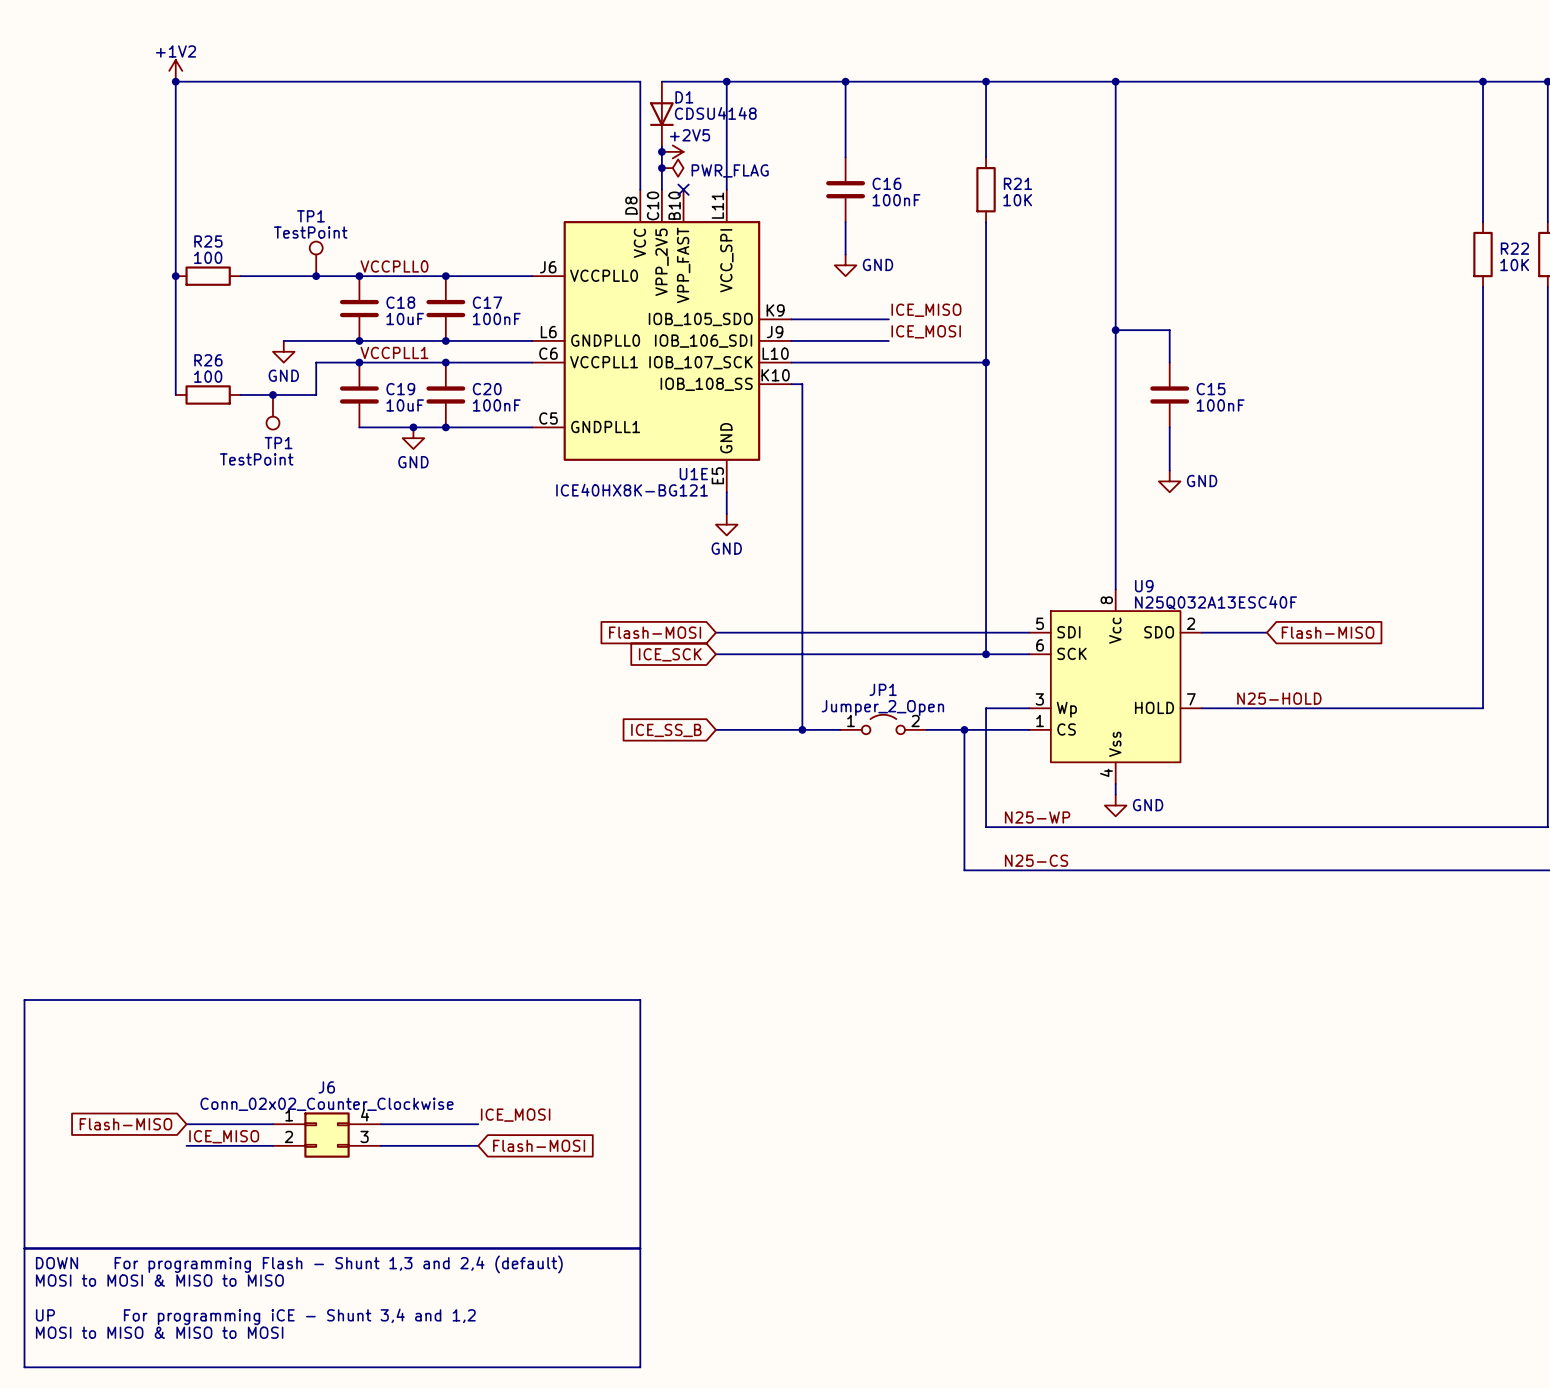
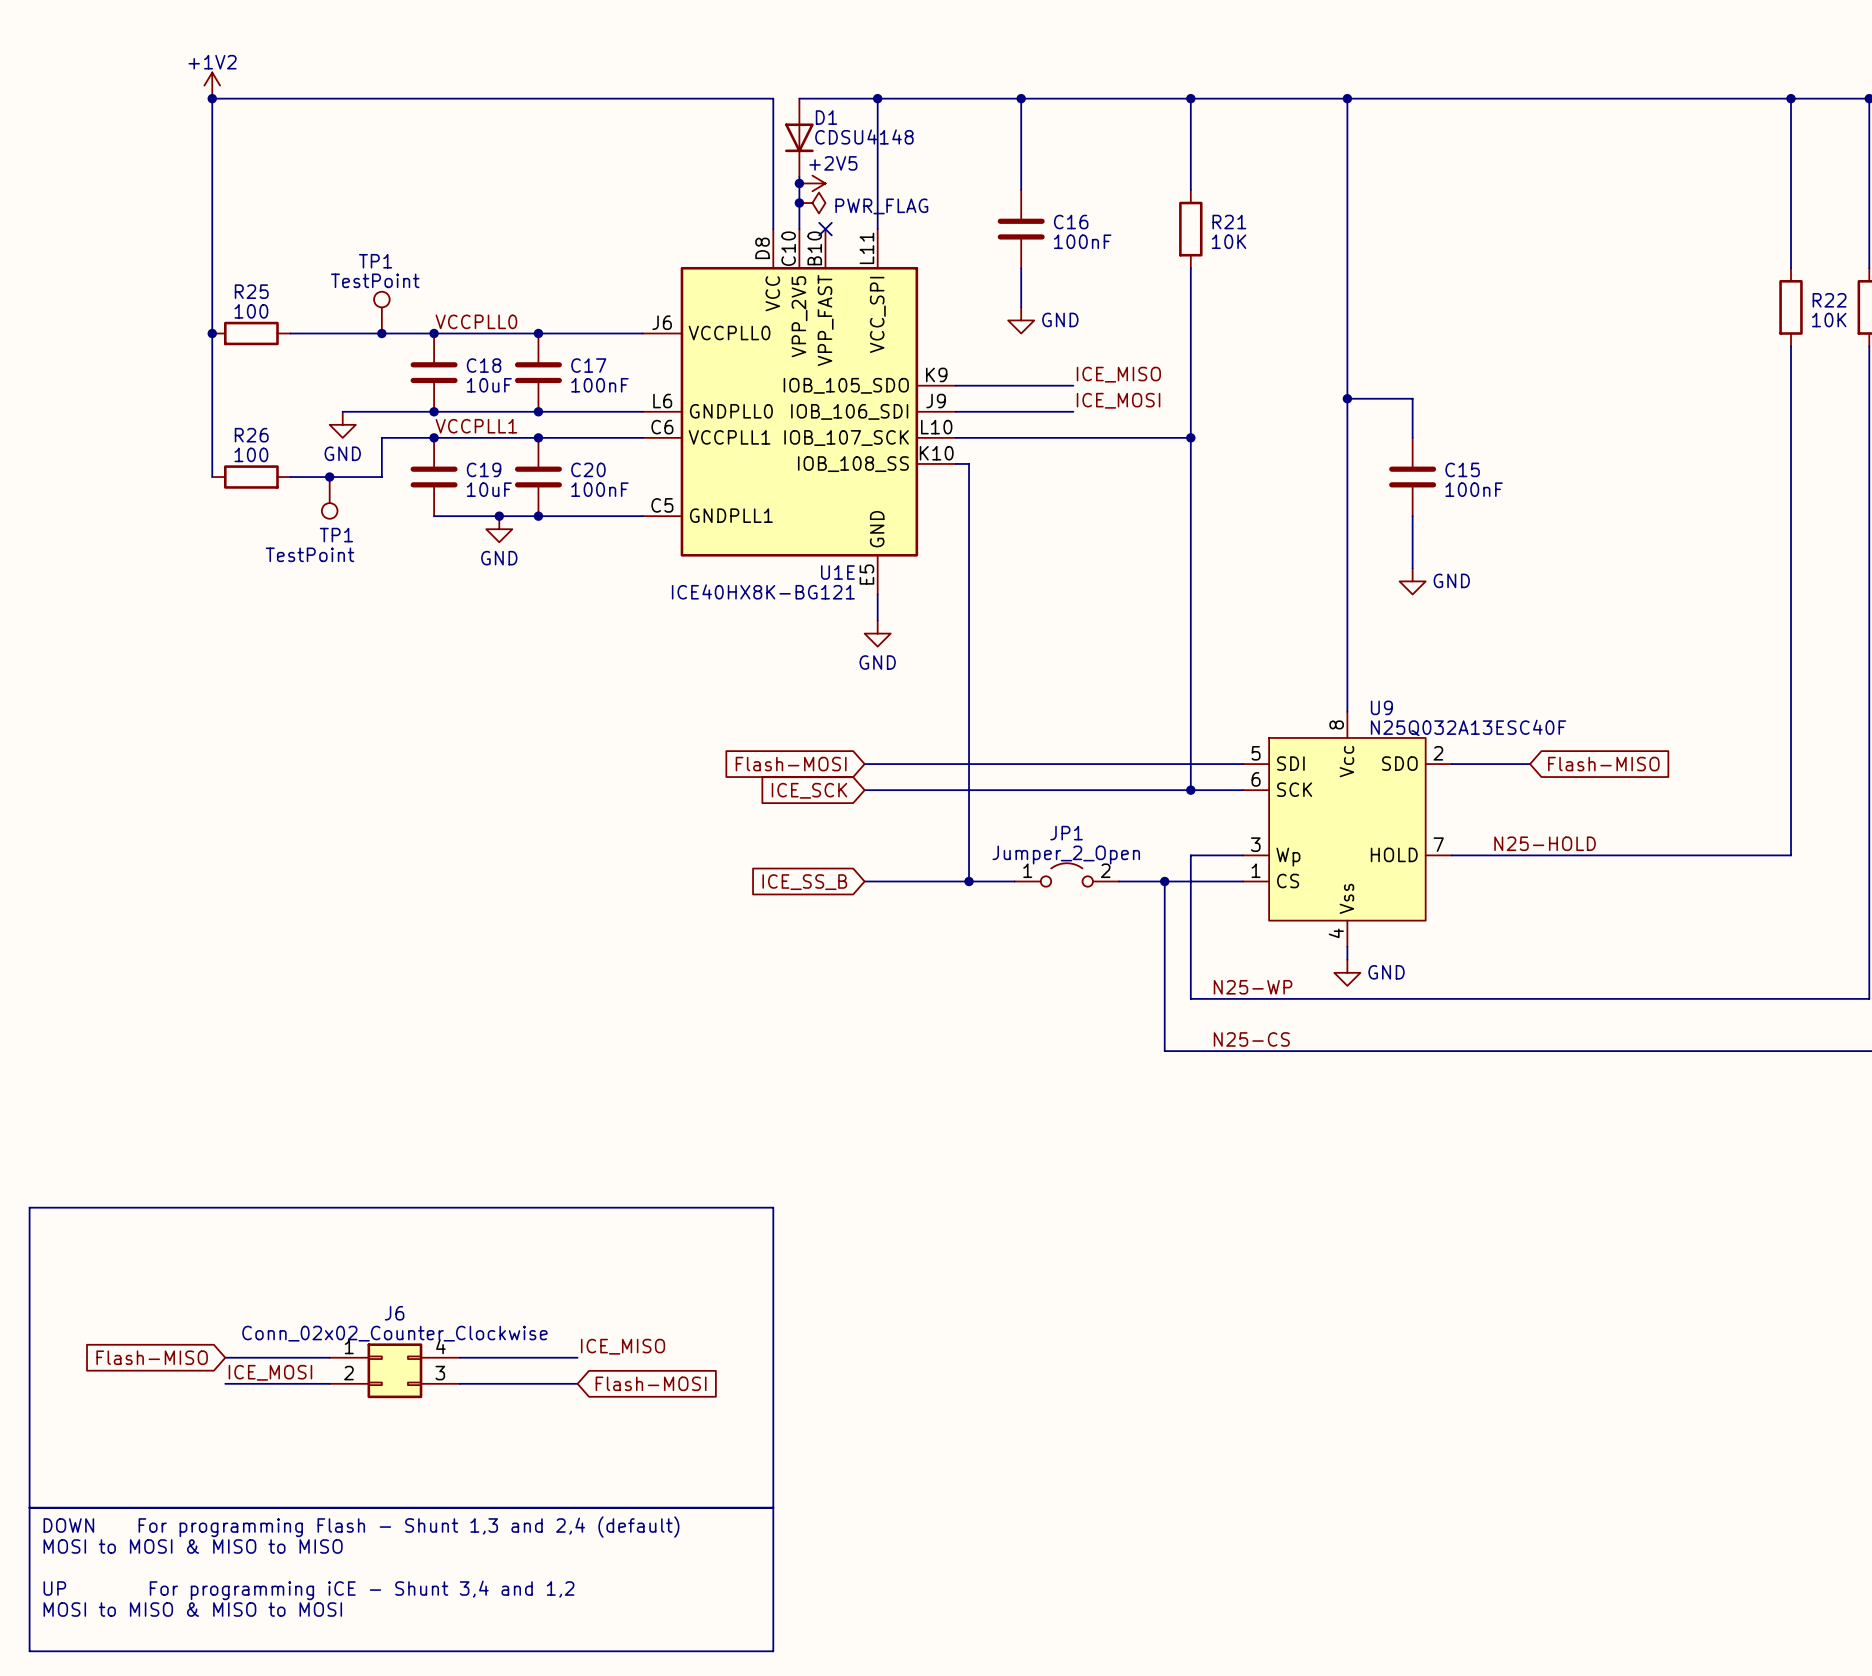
label: ICE_MOSI (515, 1115) -> ICE_MISO (623, 1346)
label: ICE_MISO (224, 1136) -> ICE_MOSI (270, 1372)

